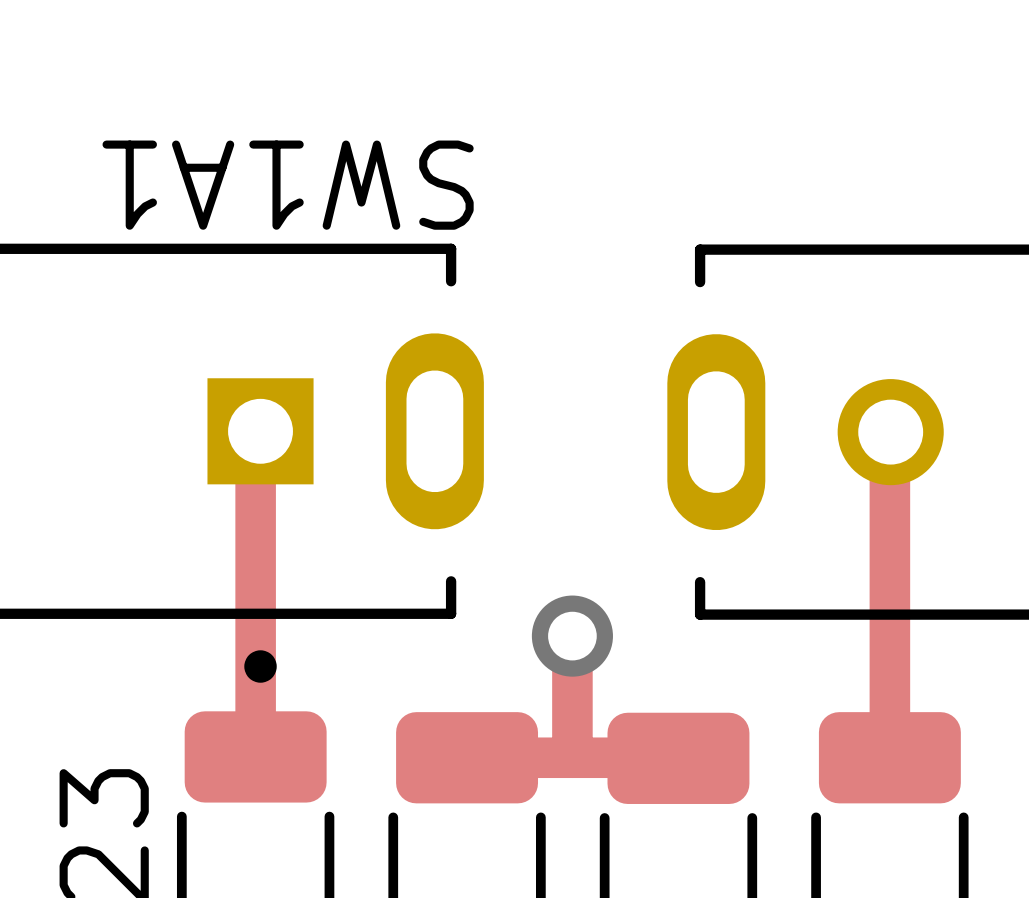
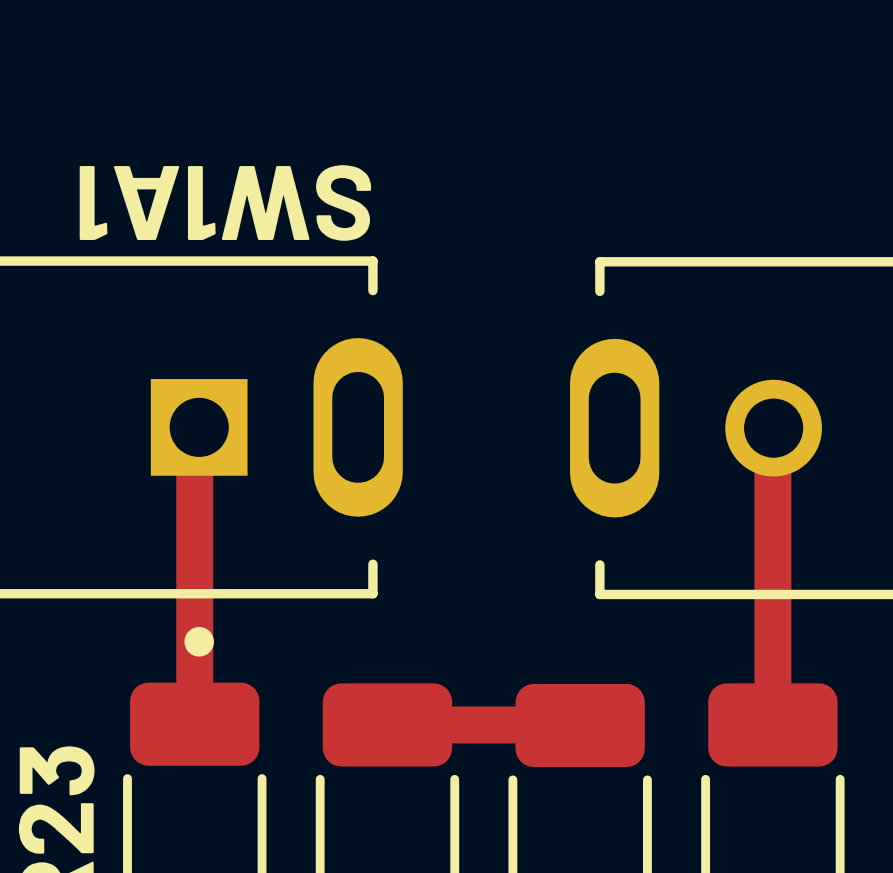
top track: (572, 636) (572, 757) -> none
via: (572, 636) -> none

